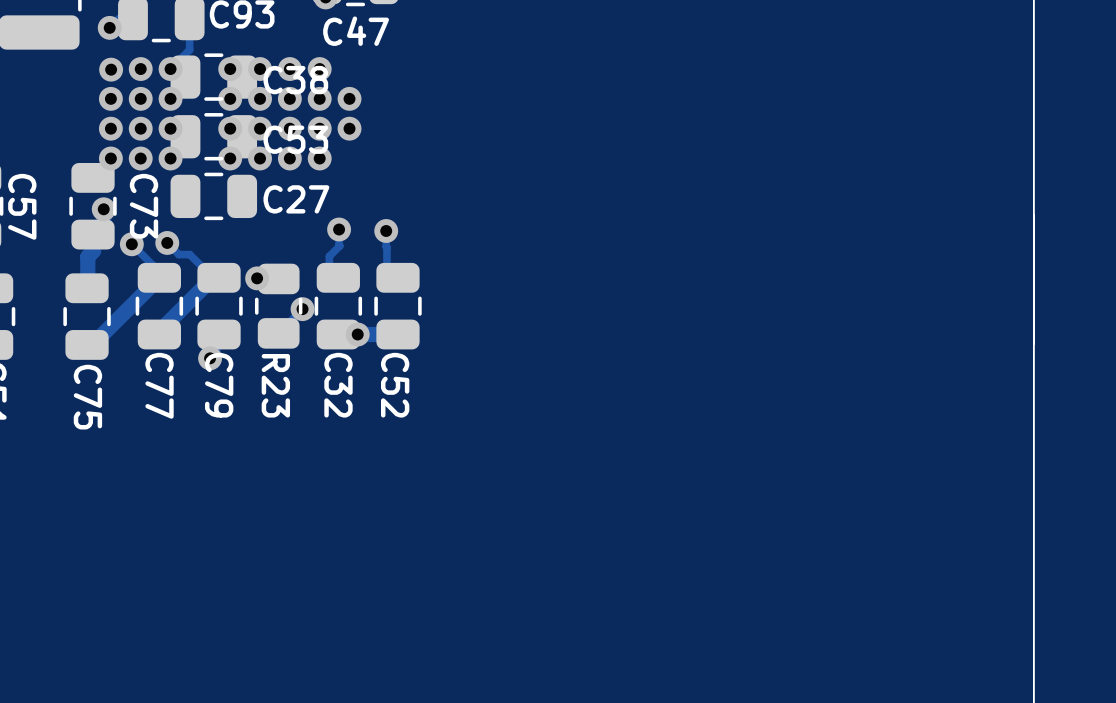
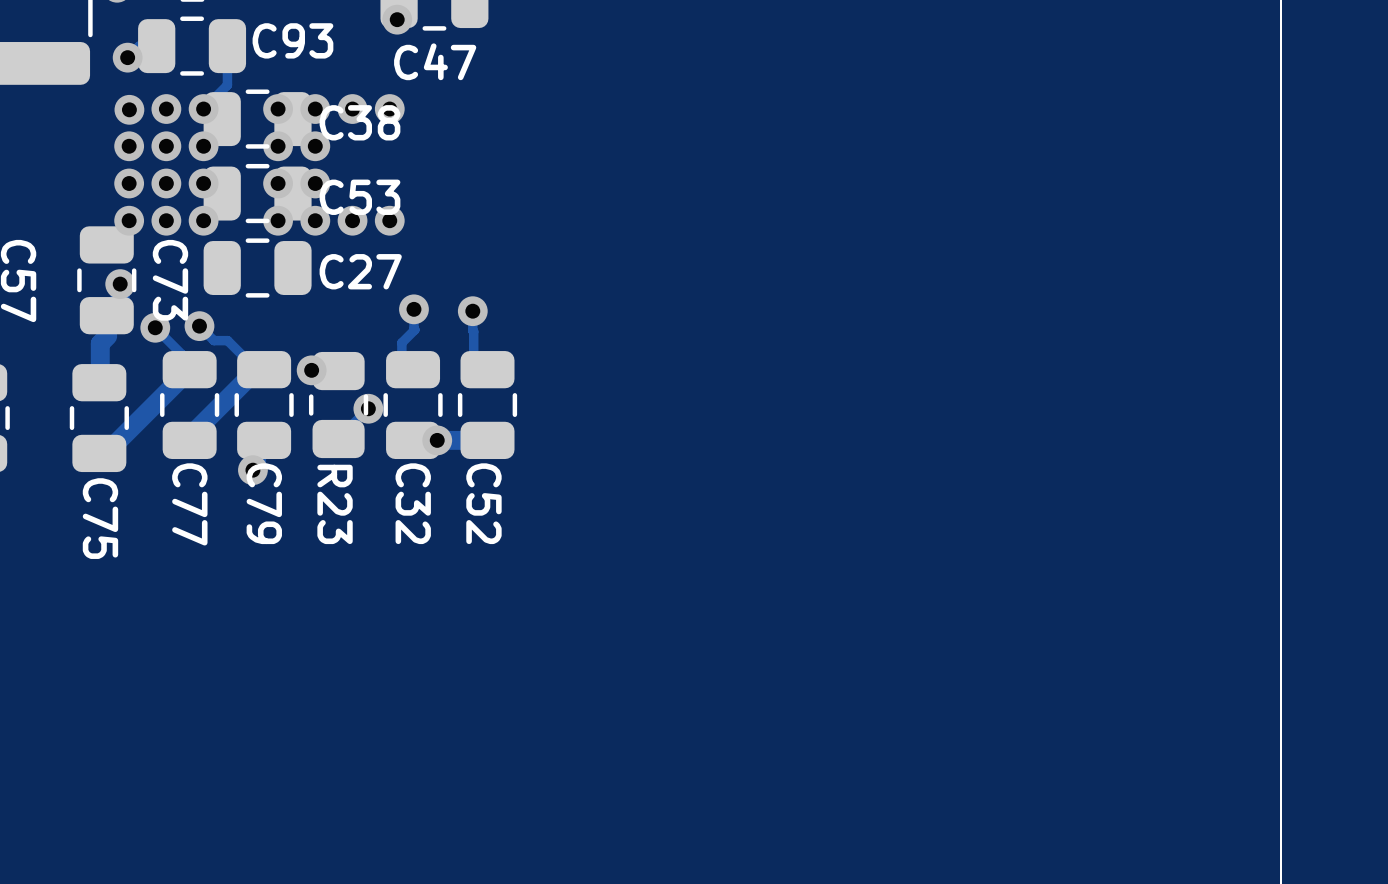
via: (289, 98) -> none
via: (319, 98) -> none
via: (349, 98) -> none
via: (289, 128) -> none
via: (319, 128) -> none
via: (349, 128) -> none

